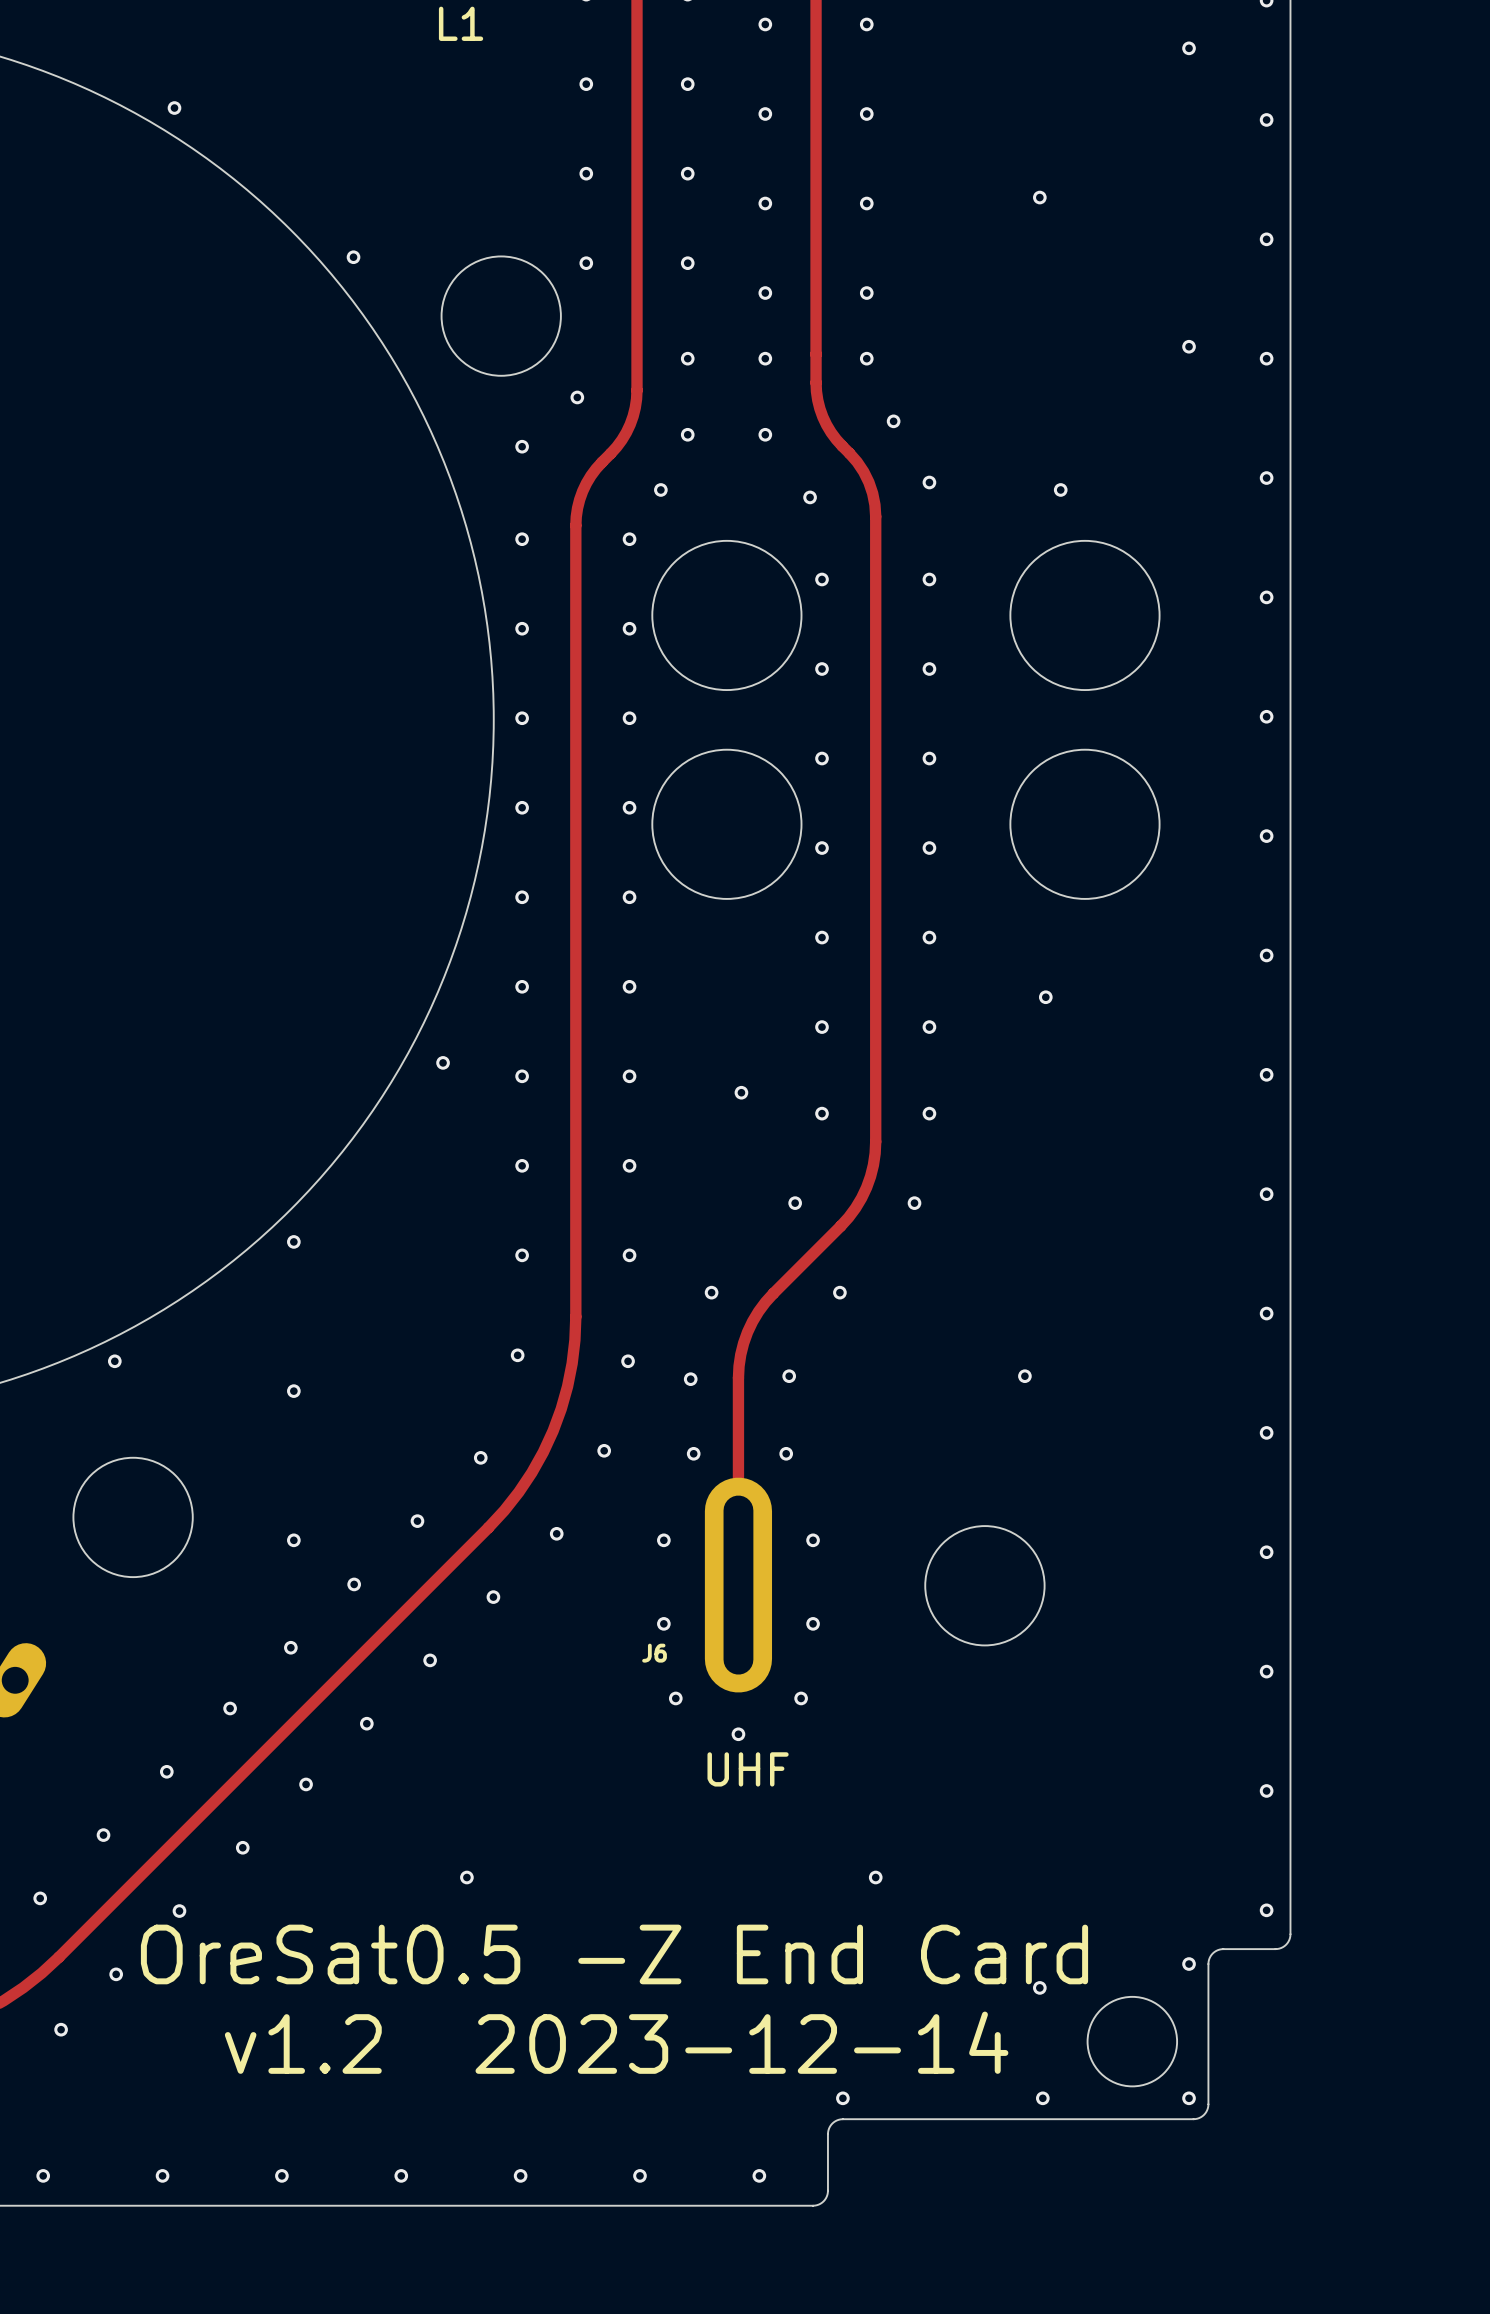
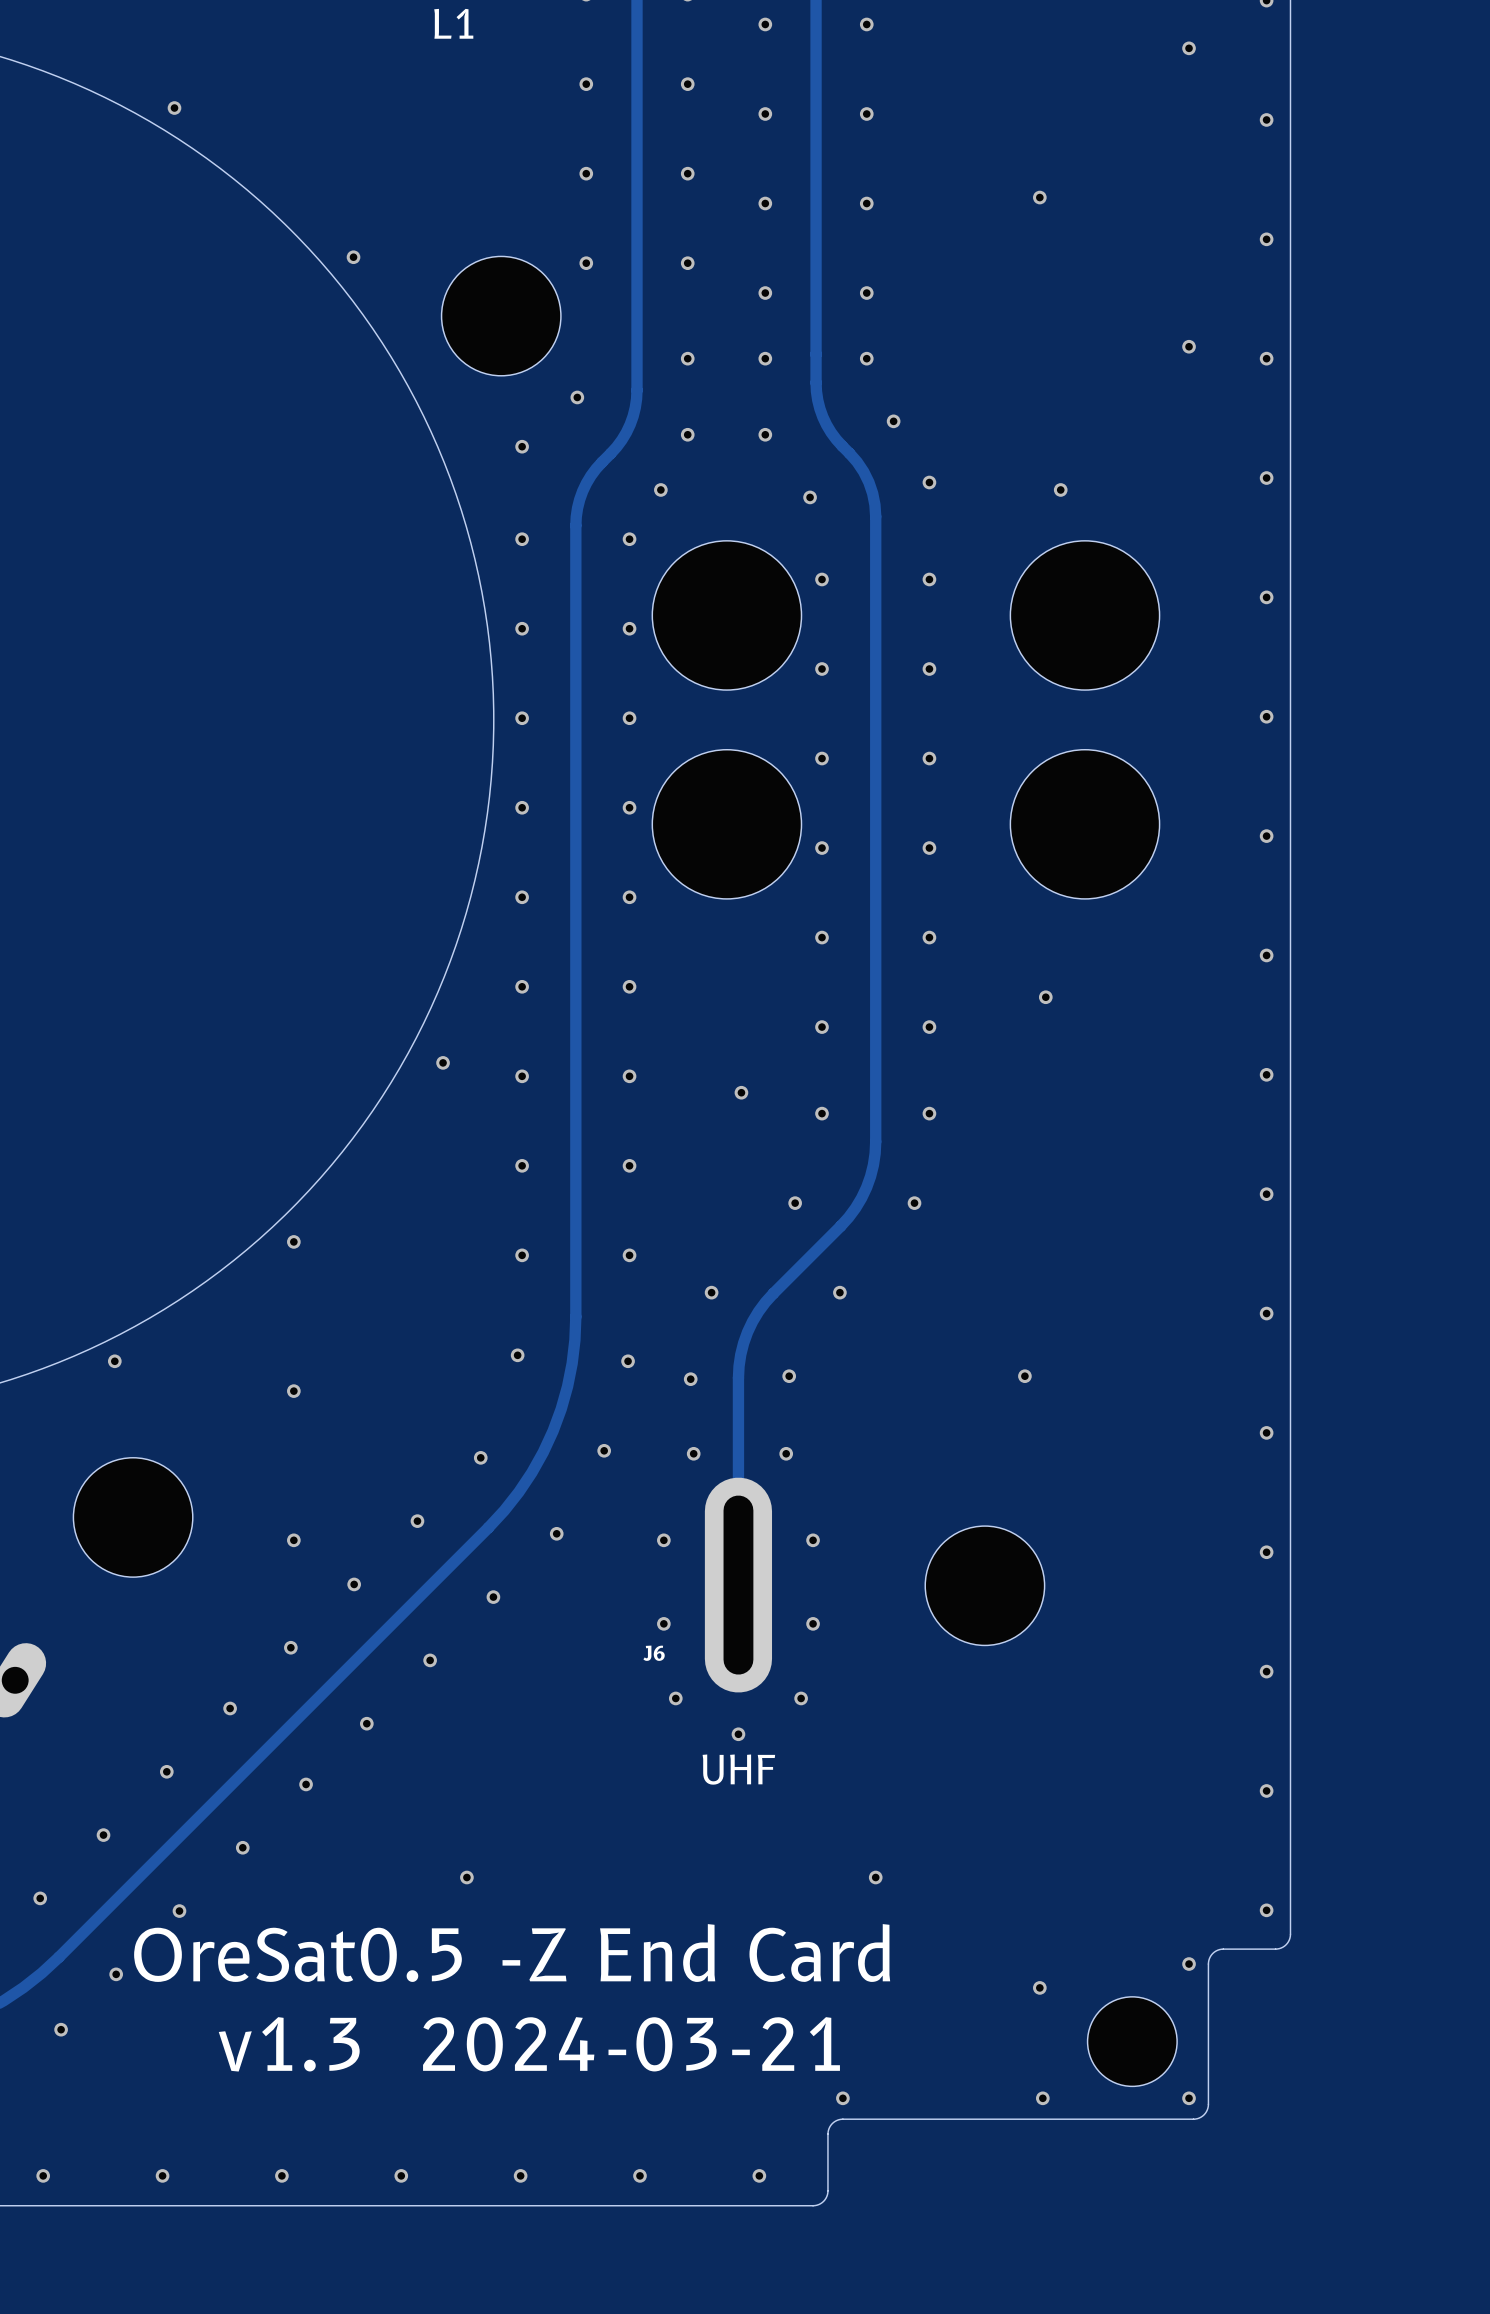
text: v1.2 2023-12-14 (616, 2042) -> v1.3 2024-03-21 (529, 2044)

